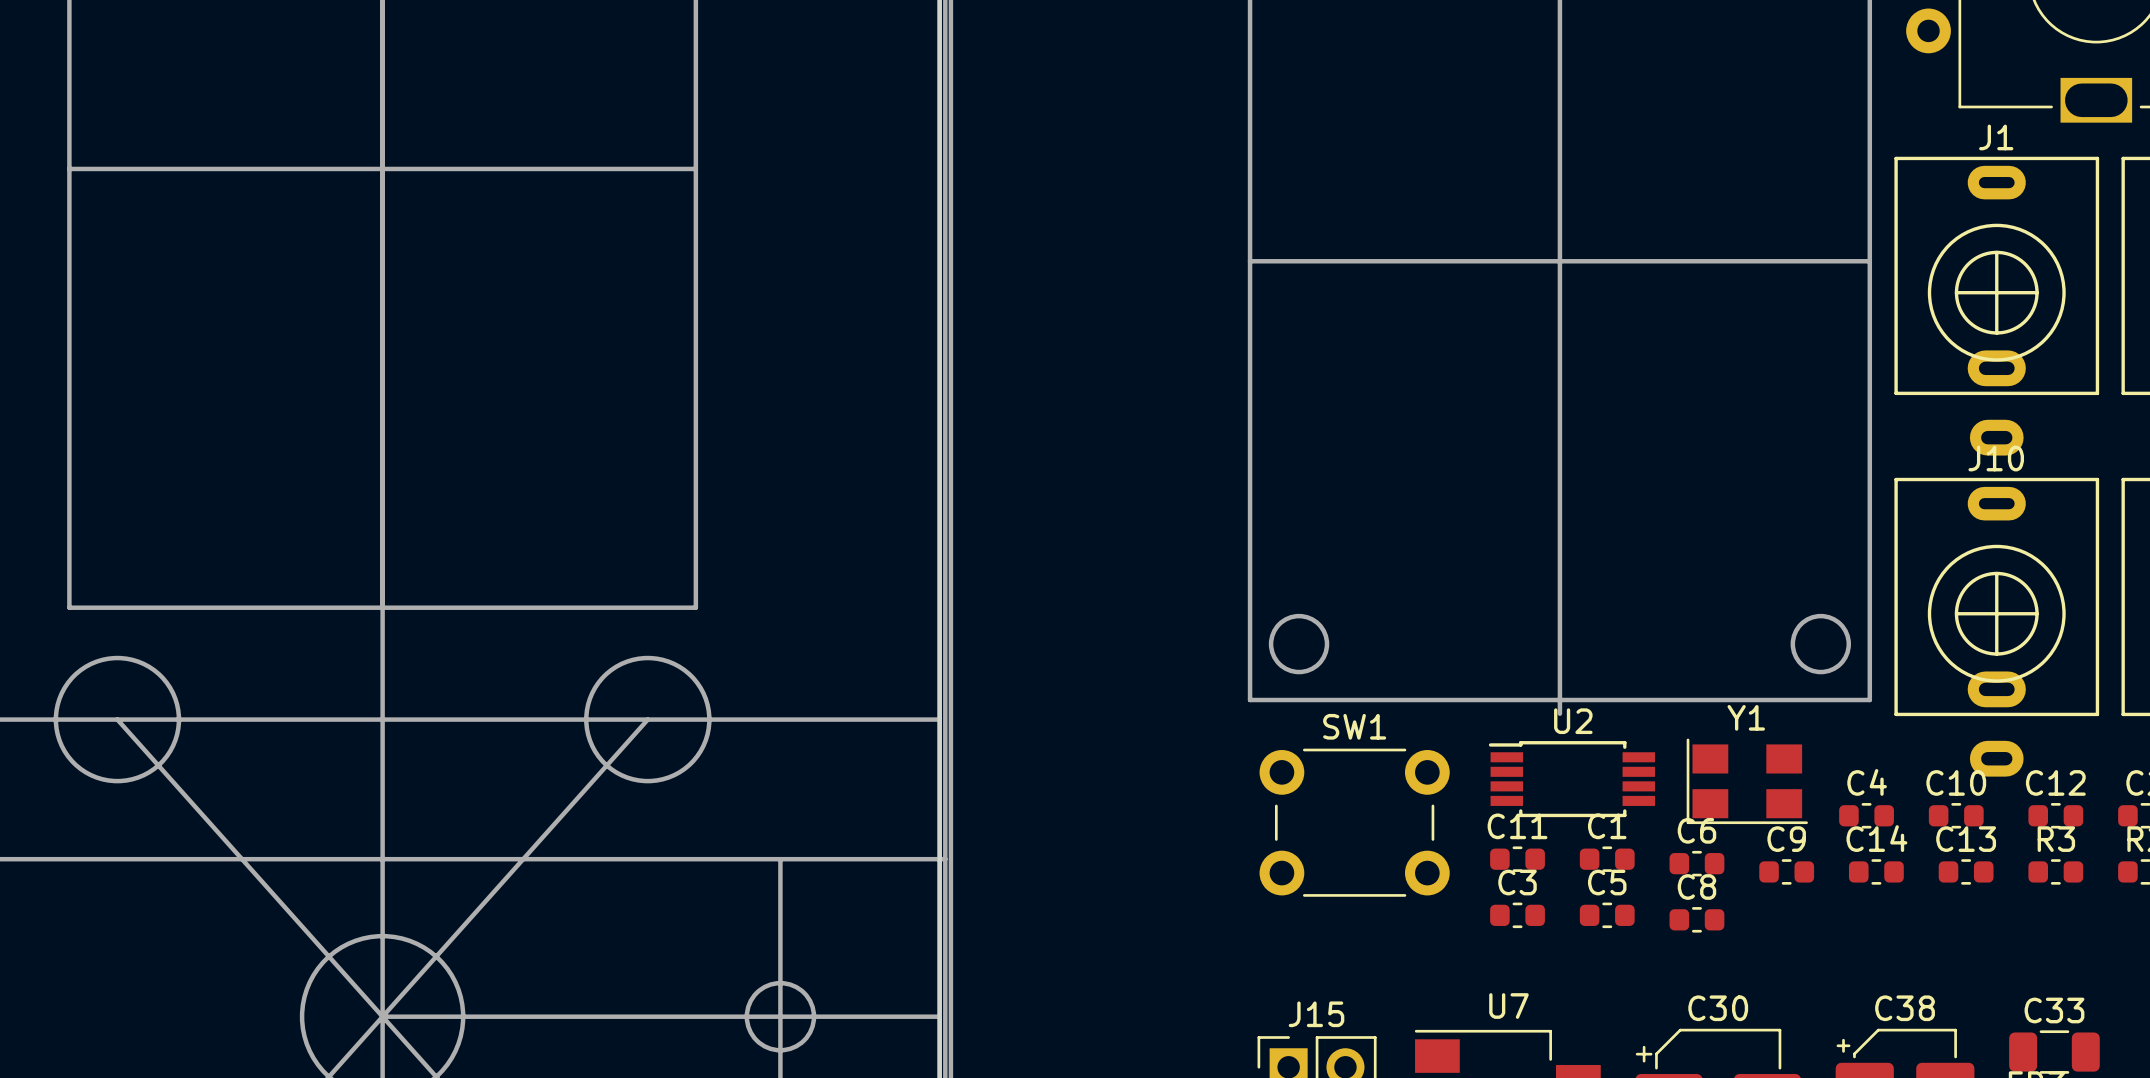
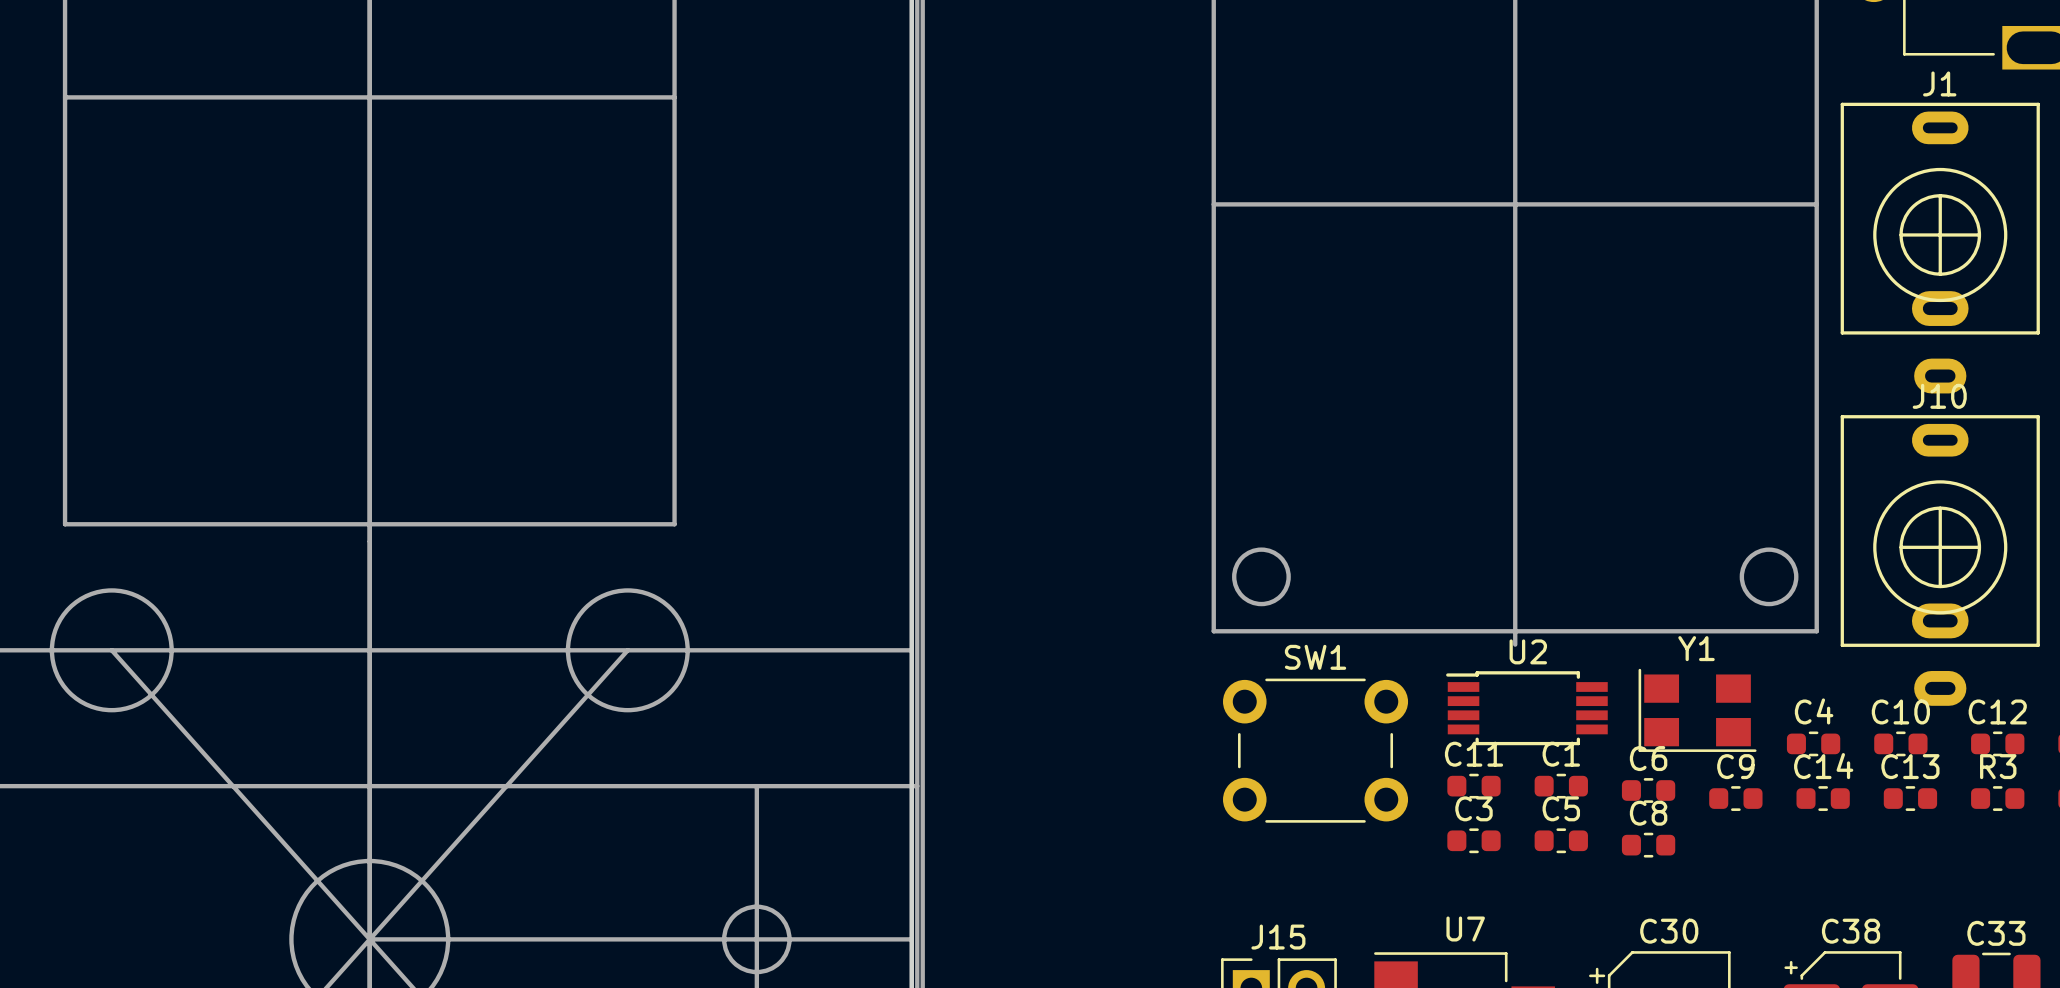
line: (69, 168) (695, 168) -> (65, 97) (674, 97)
line: (69, 590) (69, 607) (695, 607) (695, 590) -> (65, 524) (674, 524)

